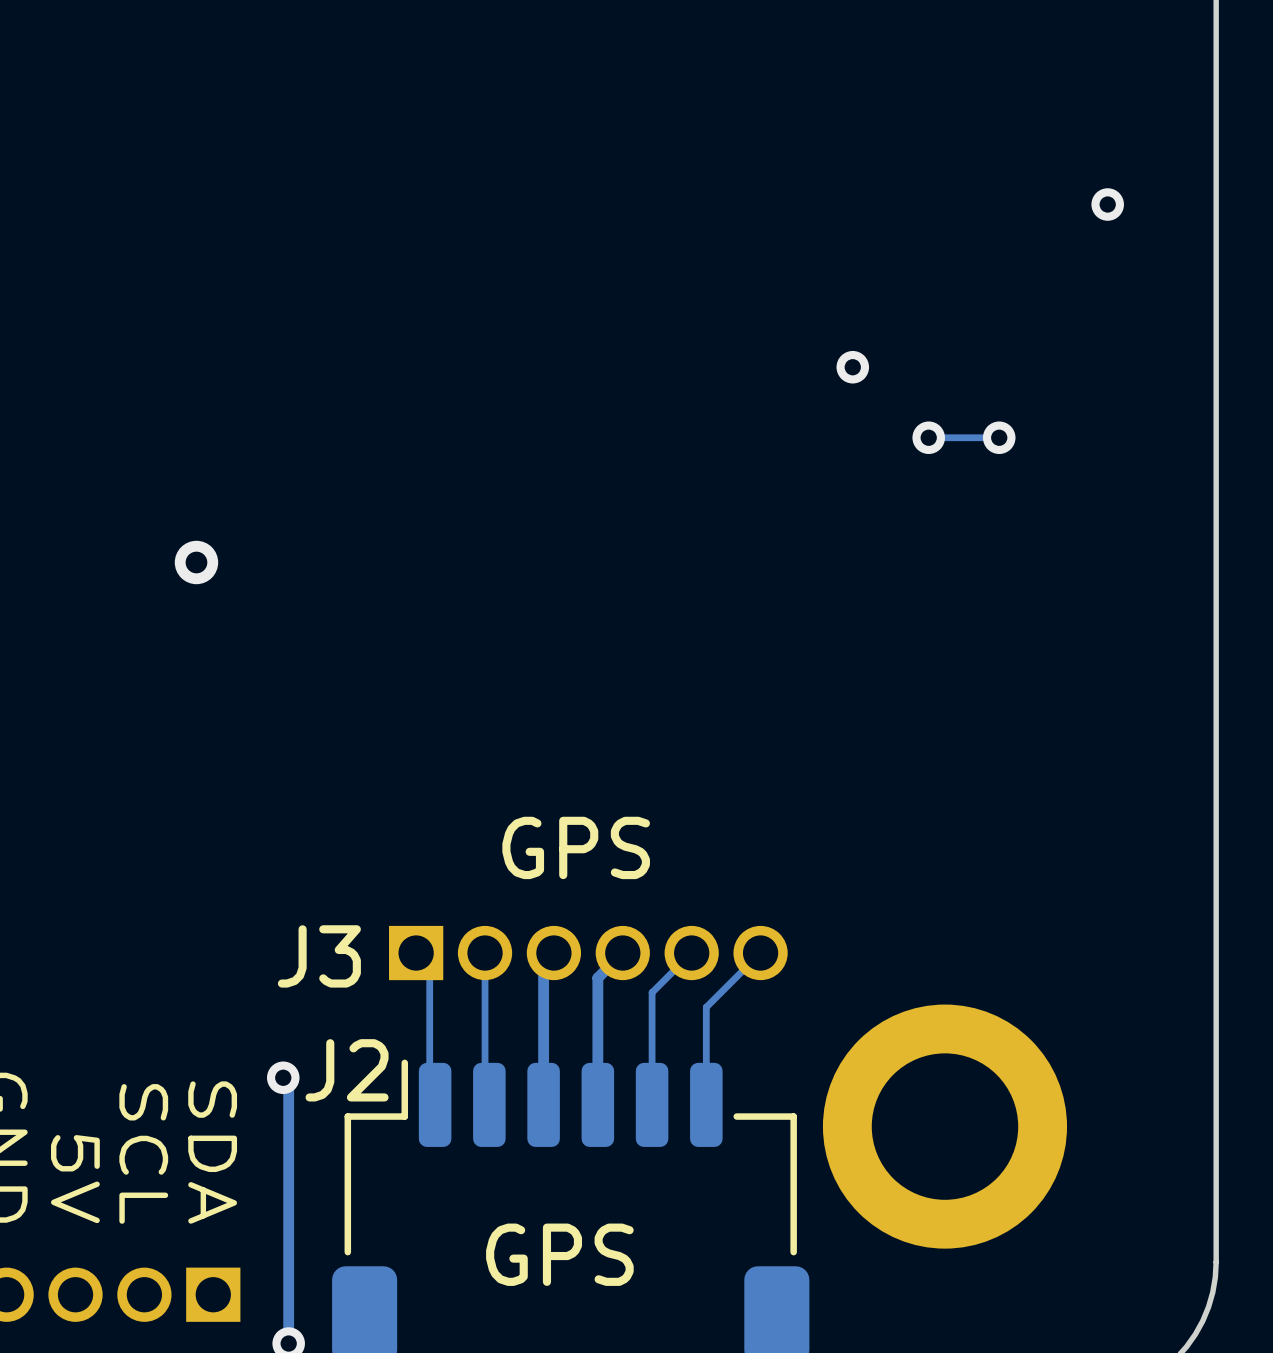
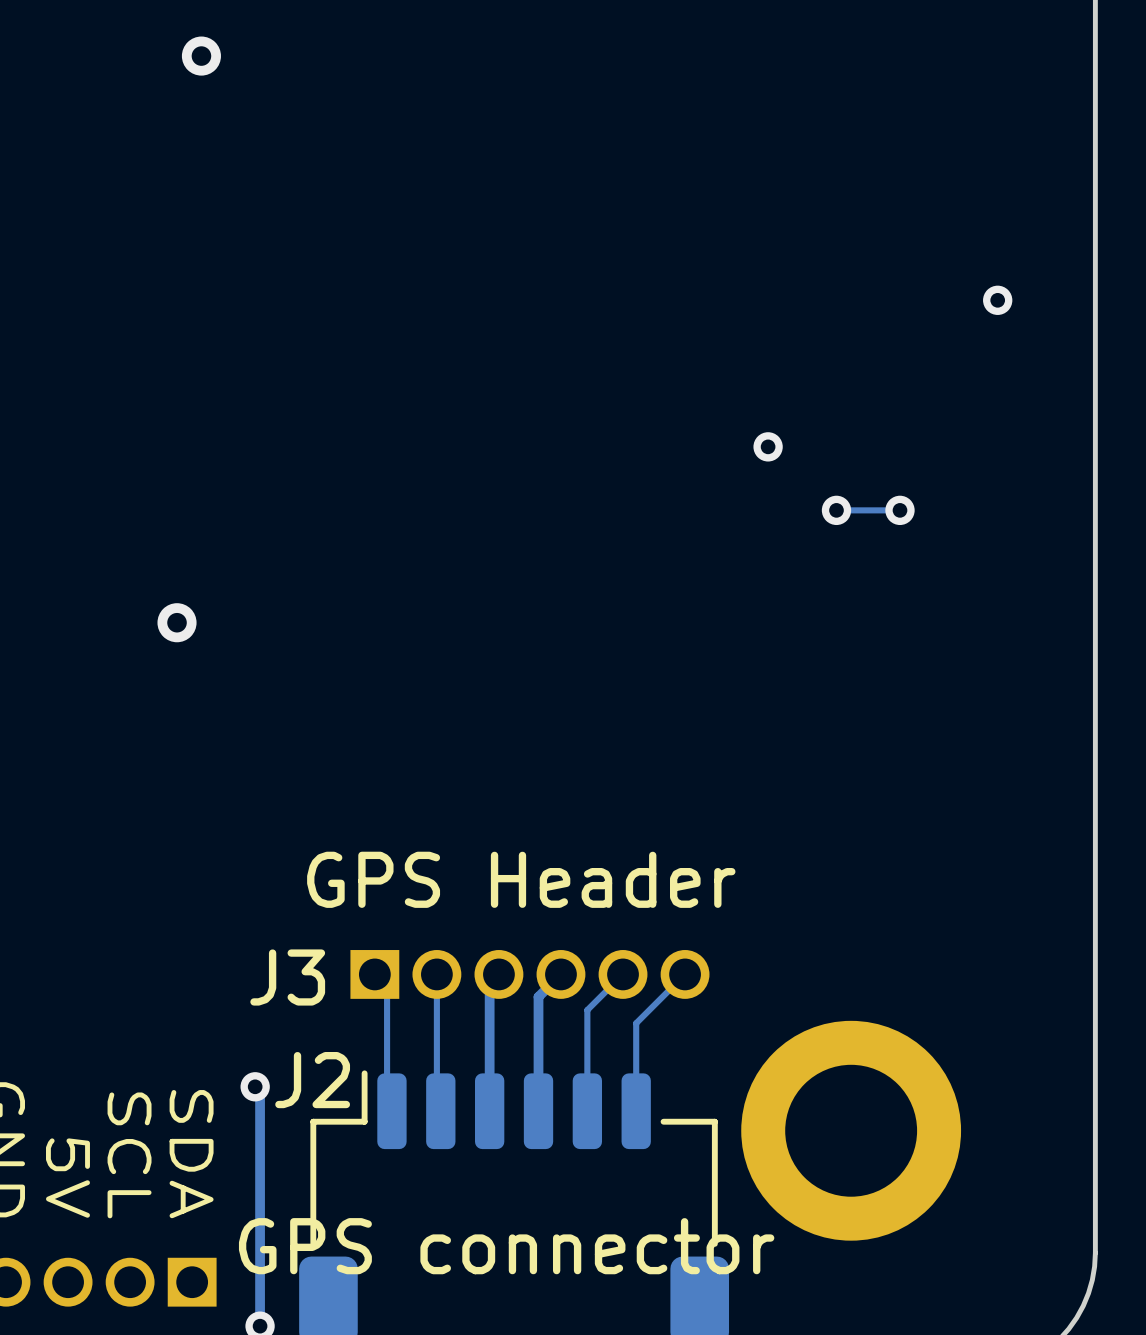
J3 value: GPS (576, 847) -> GPS Header (521, 879)
J2 value: GPS (559, 1254) -> GPS connector (506, 1246)

